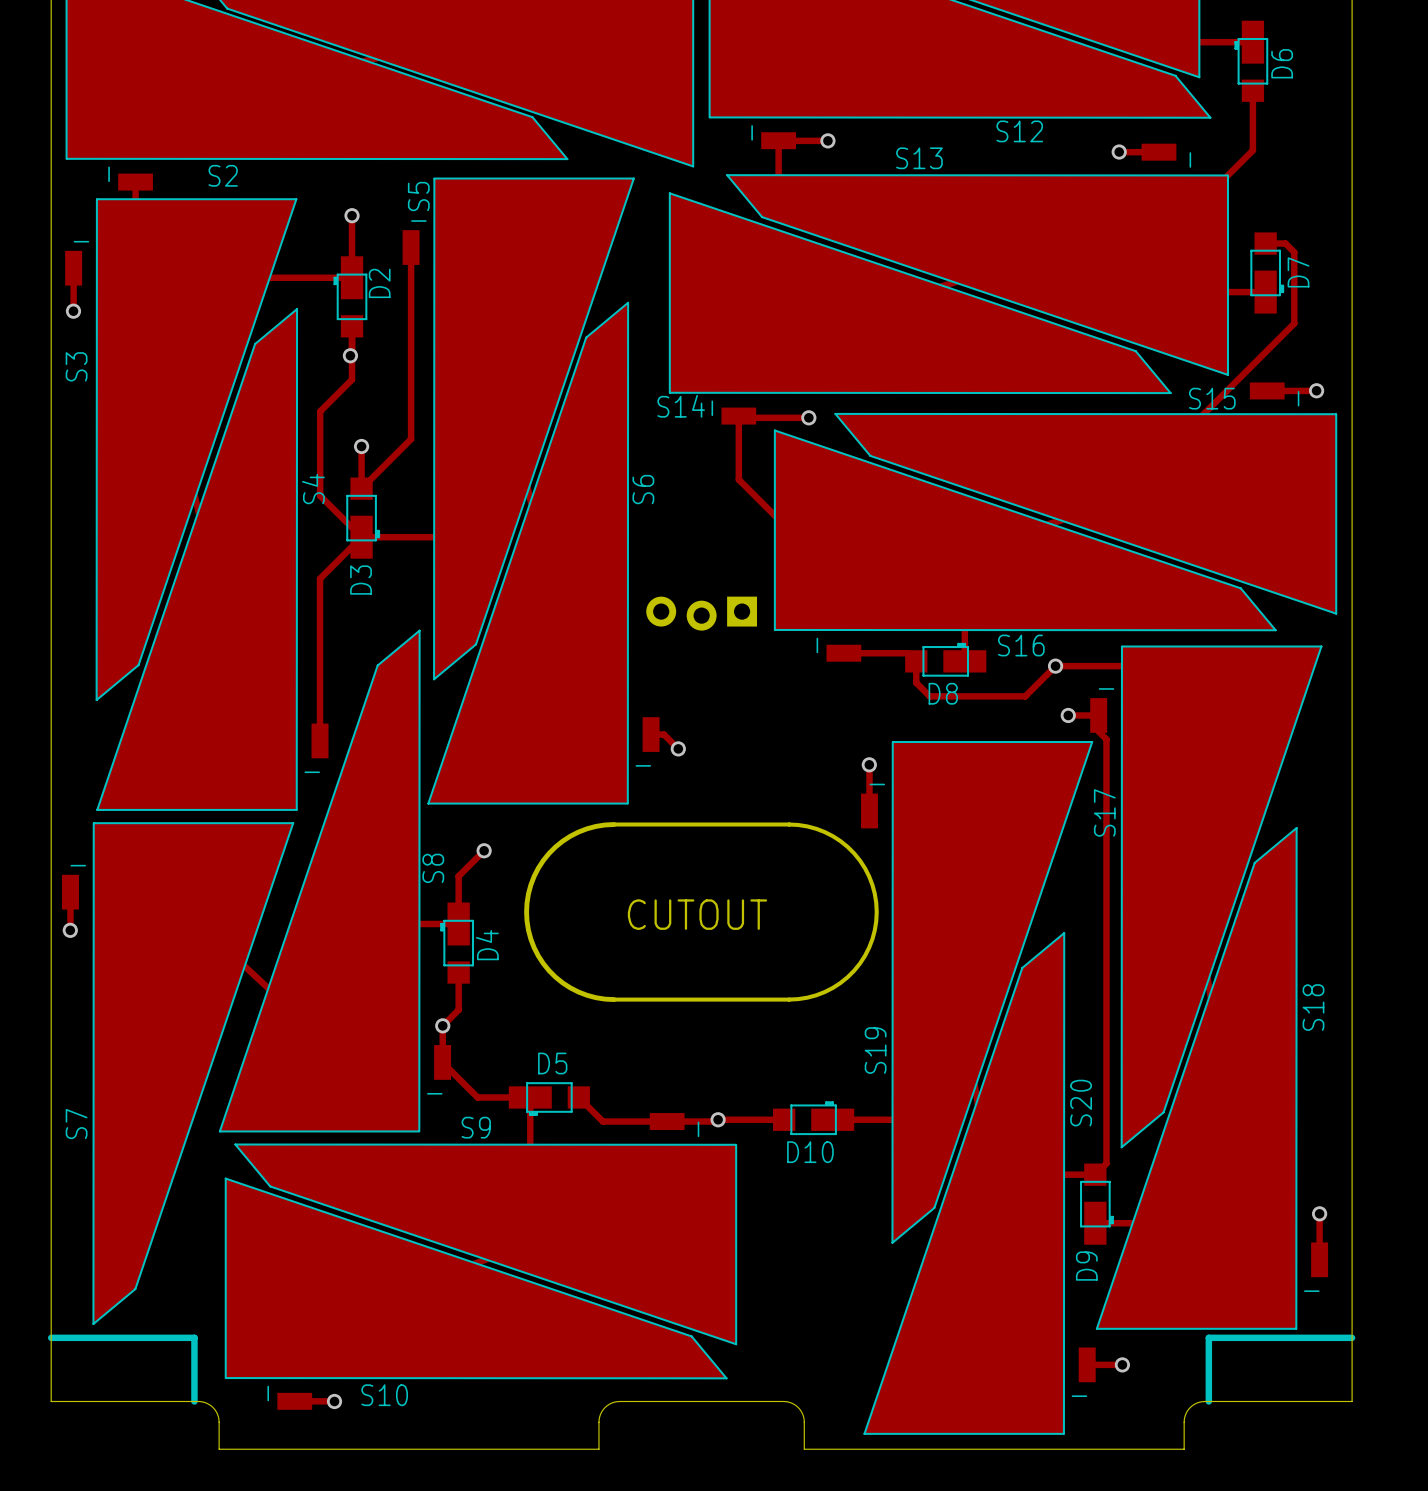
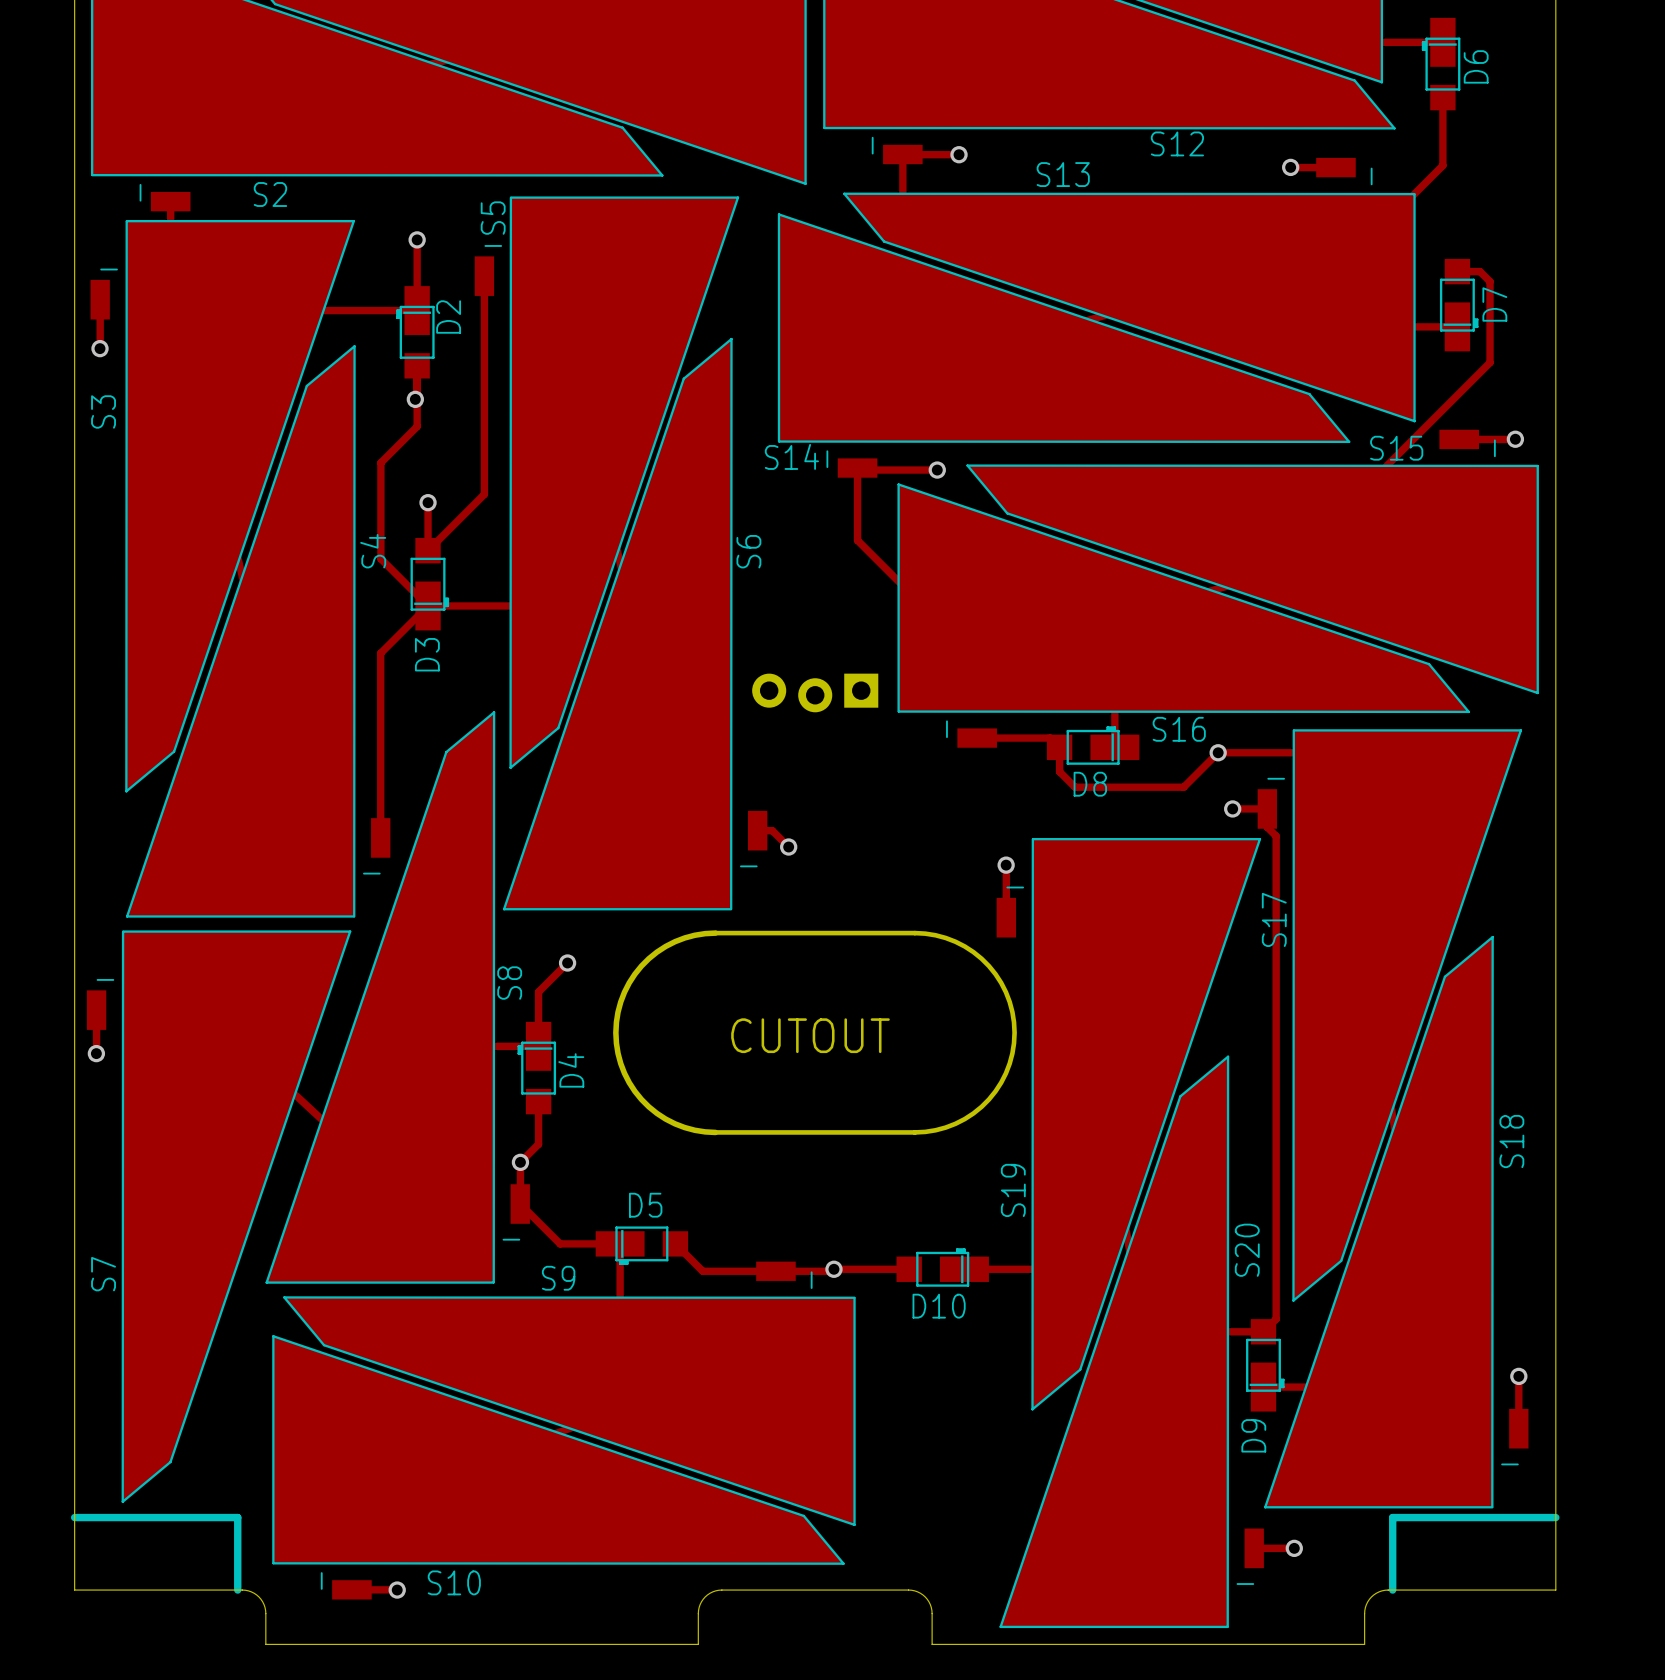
D6 footprint: [1234, 20, 1269, 102] -> [1421, 17, 1461, 111]
D7 footprint: [1250, 232, 1285, 314] -> [1439, 258, 1479, 352]
D2 footprint: [333, 256, 368, 338] -> [396, 286, 435, 379]
D3 footprint: [346, 477, 381, 559] -> [410, 538, 450, 631]
D8 footprint: [905, 642, 987, 677] -> [1046, 726, 1140, 765]
D4 footprint: [440, 902, 475, 984] -> [517, 1021, 557, 1115]
D5 footprint: [508, 1082, 590, 1117] -> [595, 1226, 689, 1265]
D10 footprint: [773, 1101, 855, 1136] -> [896, 1248, 989, 1287]
D9 footprint: [1080, 1163, 1114, 1245] -> [1246, 1319, 1285, 1412]

